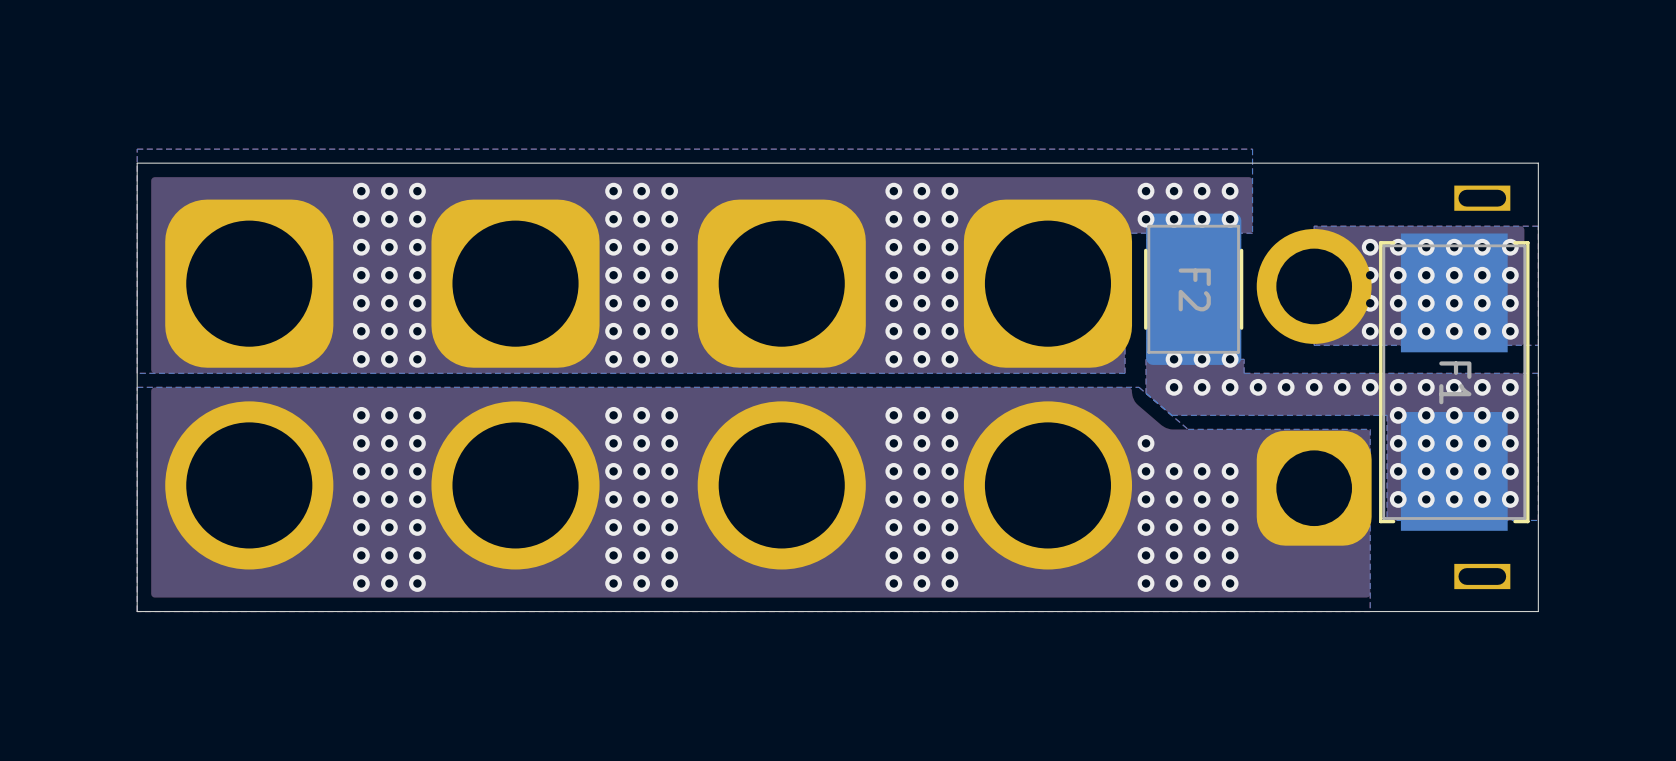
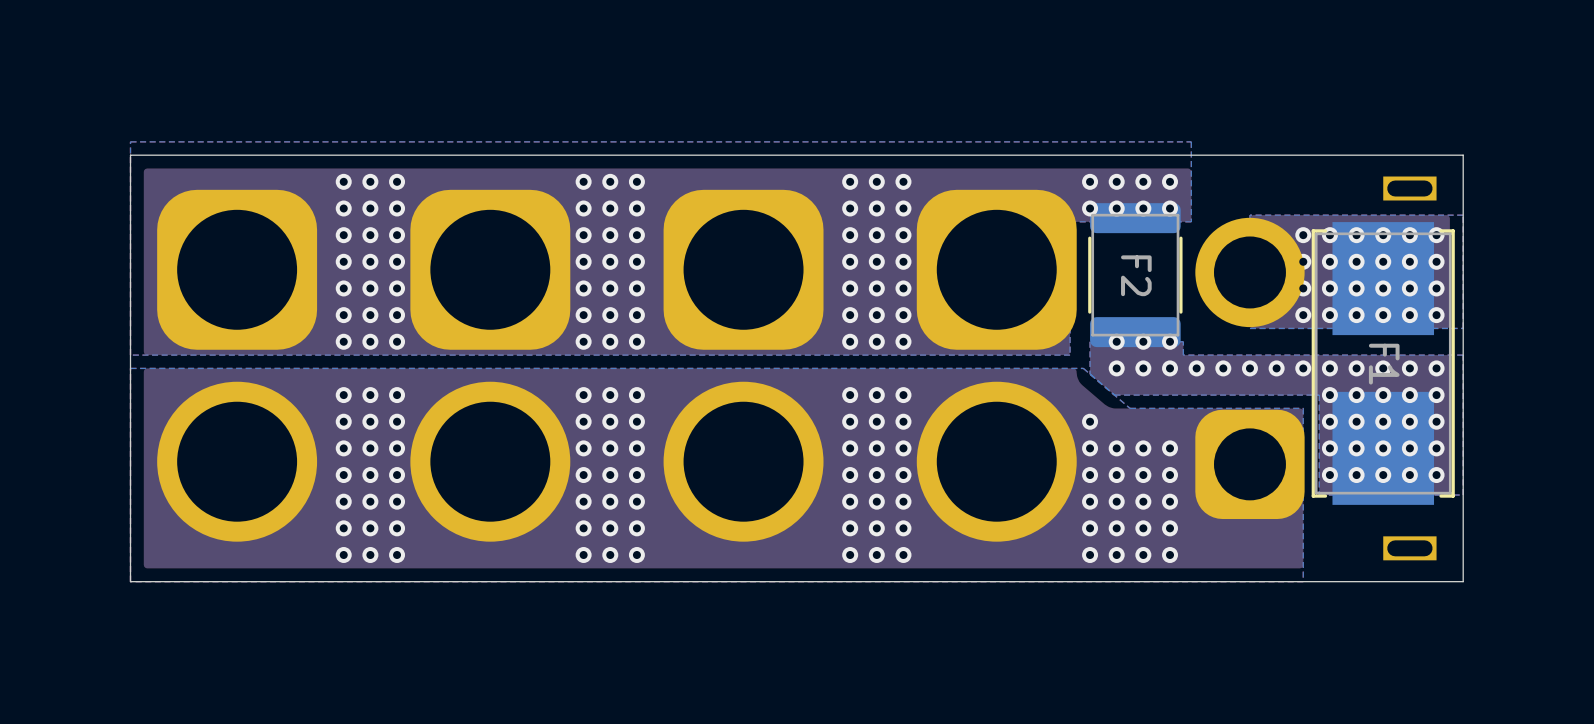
F2 footprint: [1144, 213, 1244, 365] -> [1088, 203, 1183, 348]

